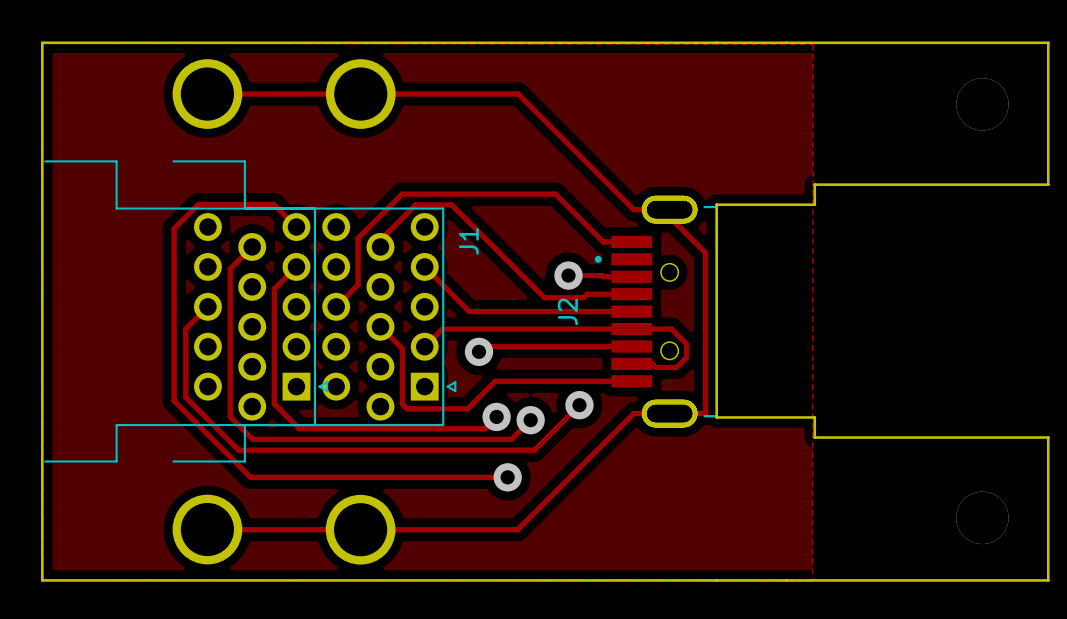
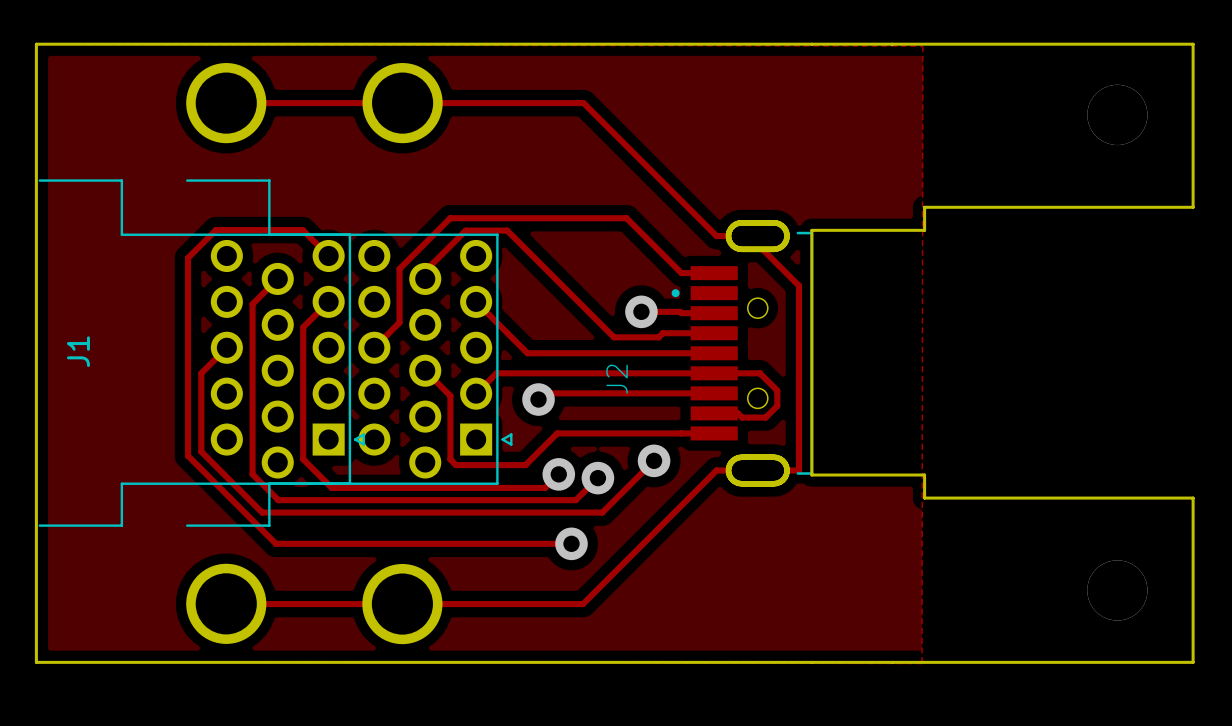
J1 name position: J1 (468, 241) -> J1 (78, 351)
J2 name position: J2 (567, 311) -> J2 (617, 379)

